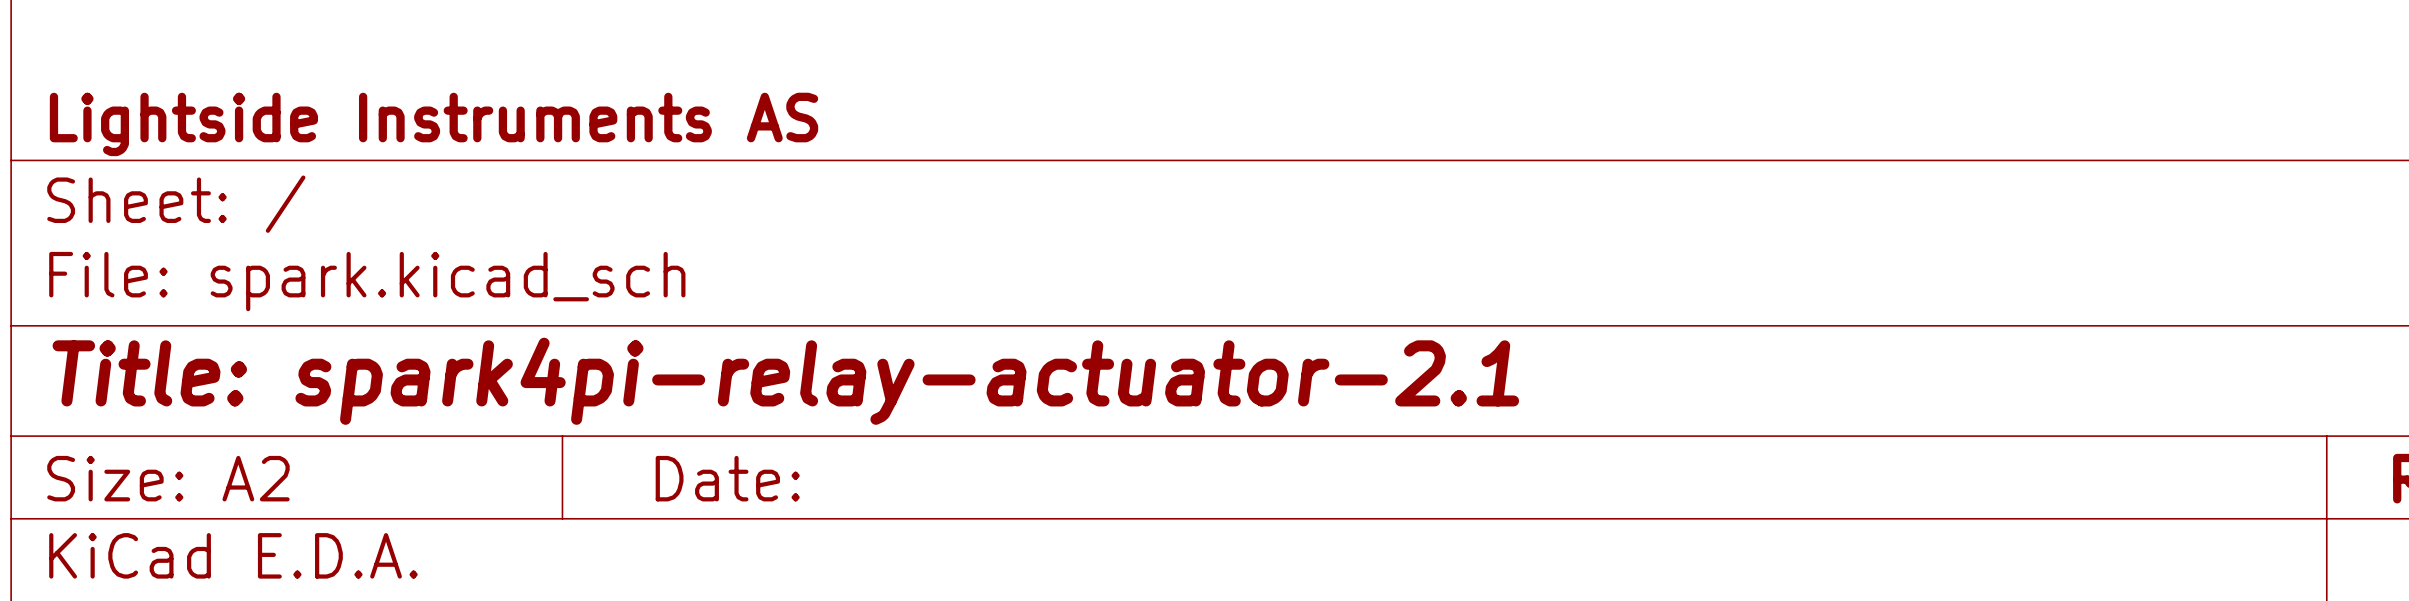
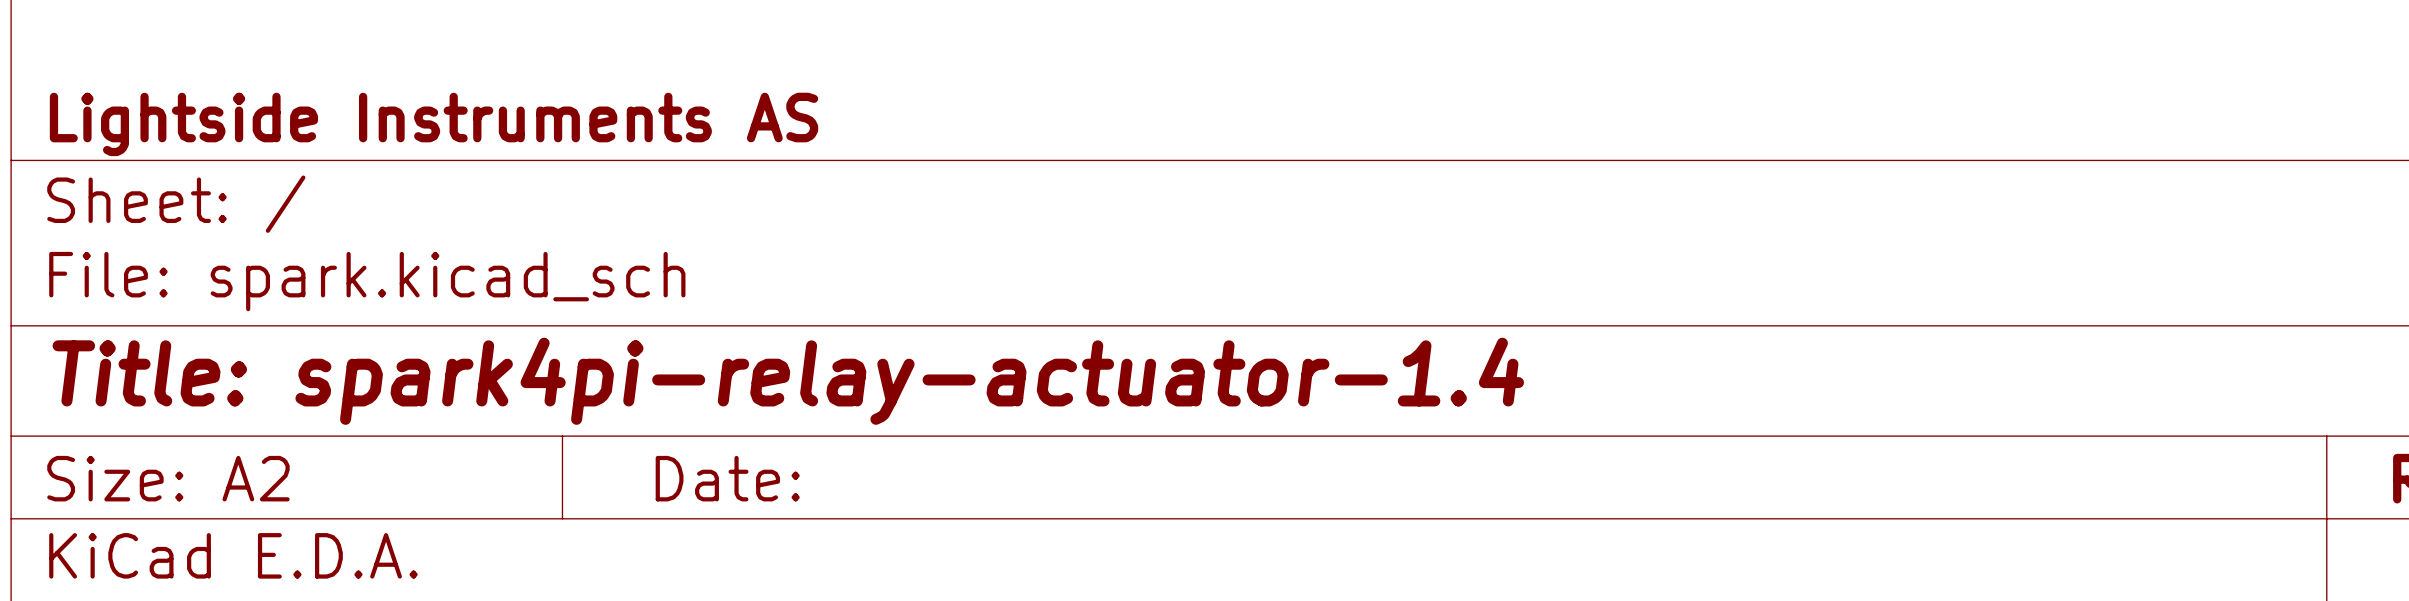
title block: Title: spark4pi-relay-actuator-2.1 (785, 381) -> Title: spark4pi-relay-actuator-1.4 (788, 381)

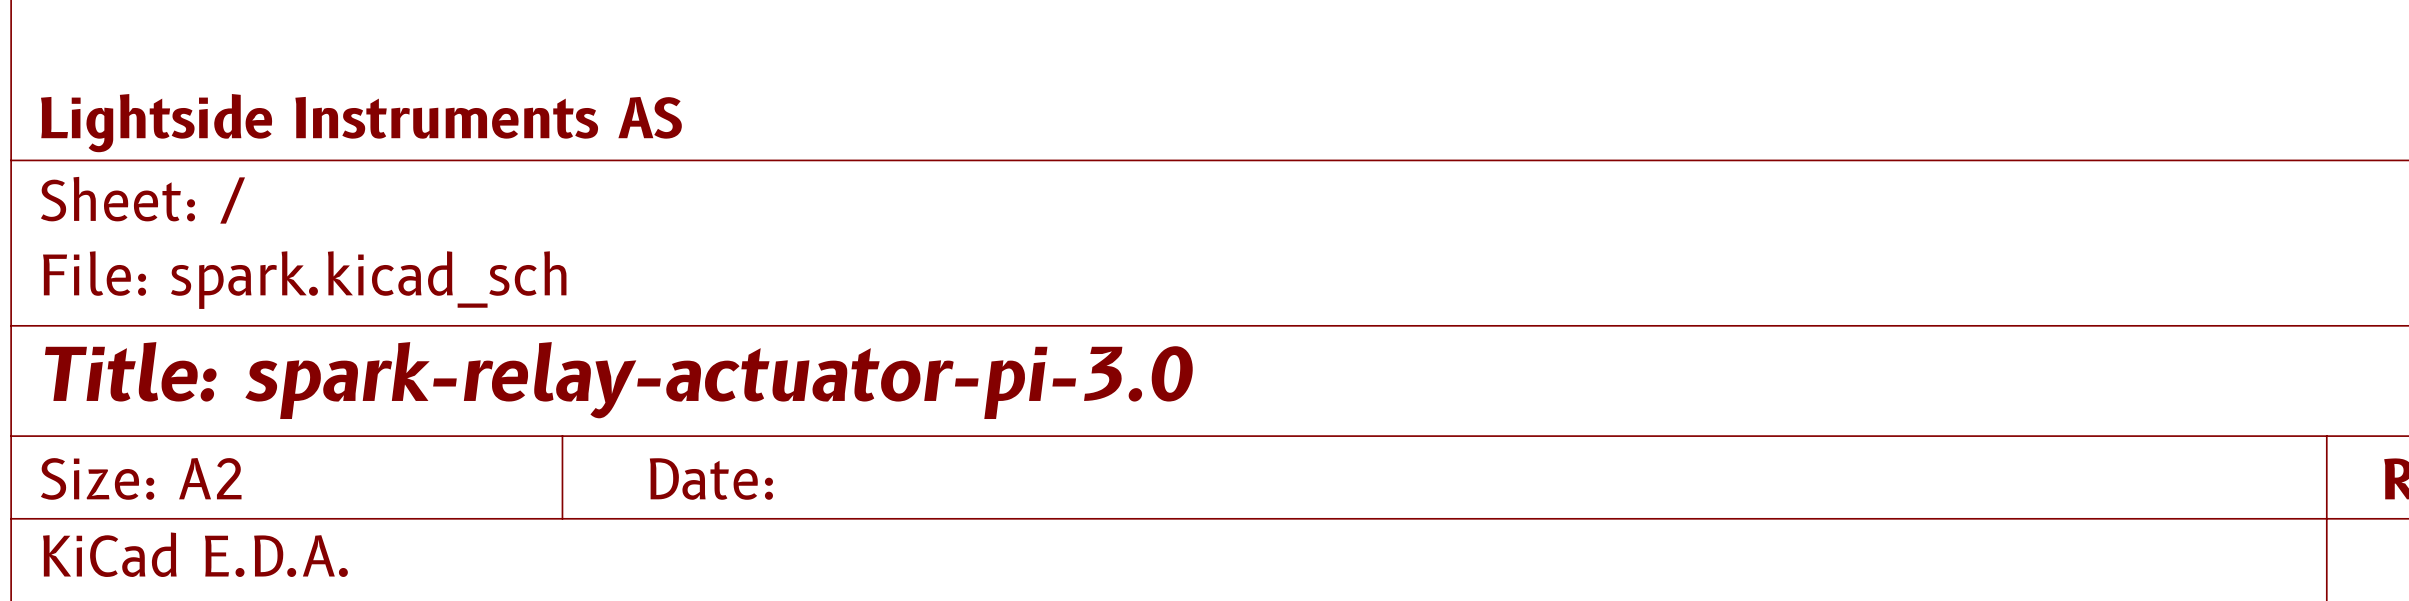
title block: Title: spark4pi-relay-actuator-1.4 (788, 381) -> Title: spark-relay-actuator-pi-3.0 (618, 380)

